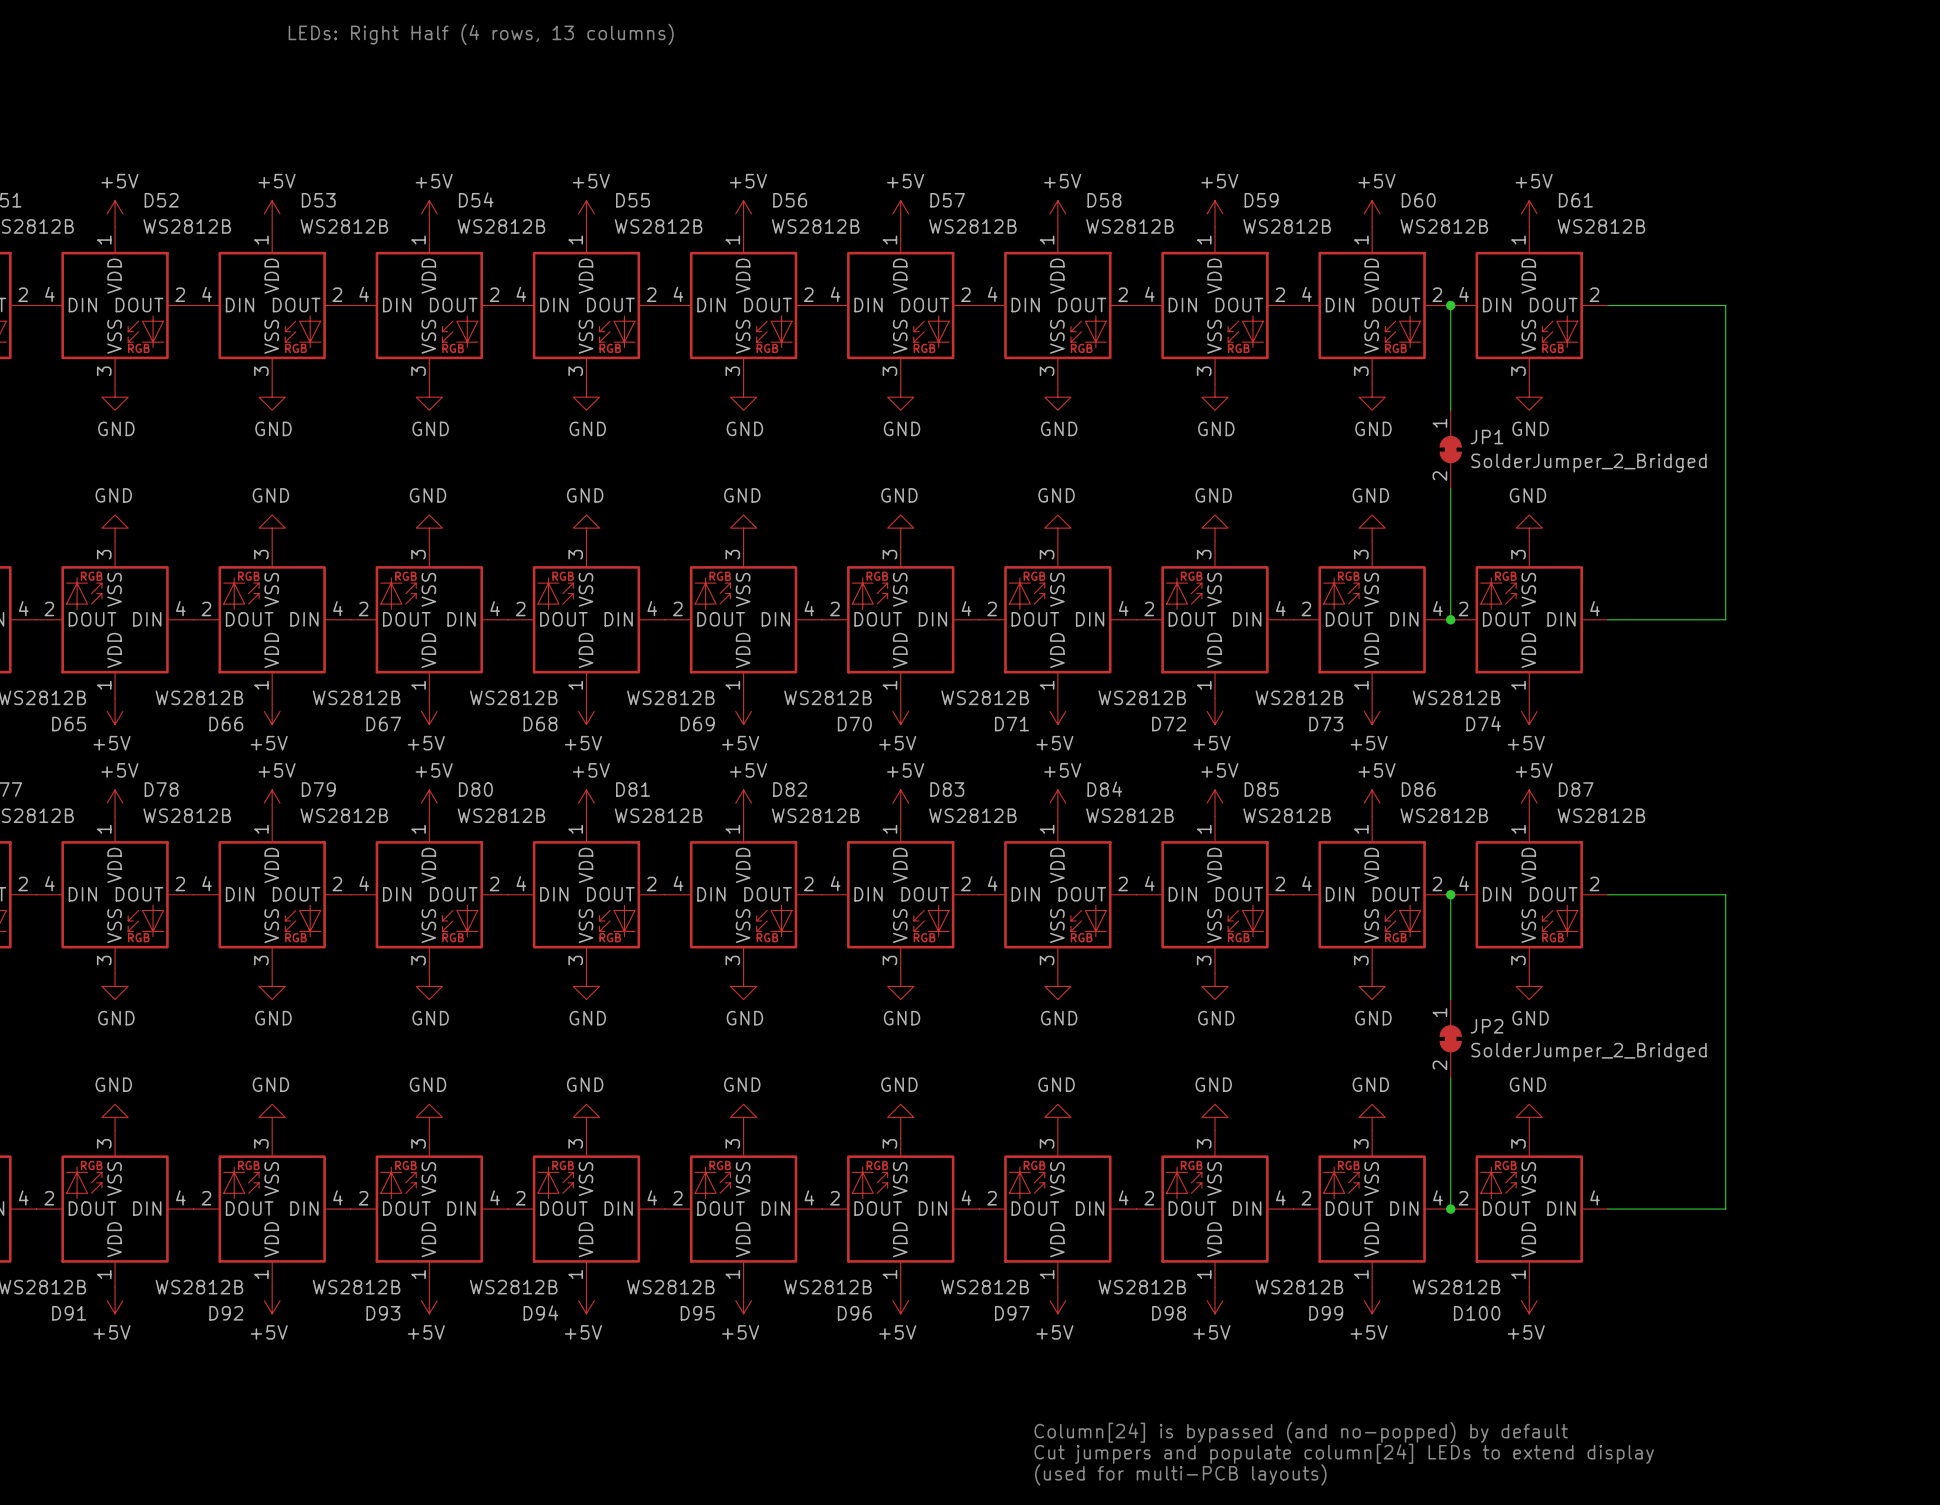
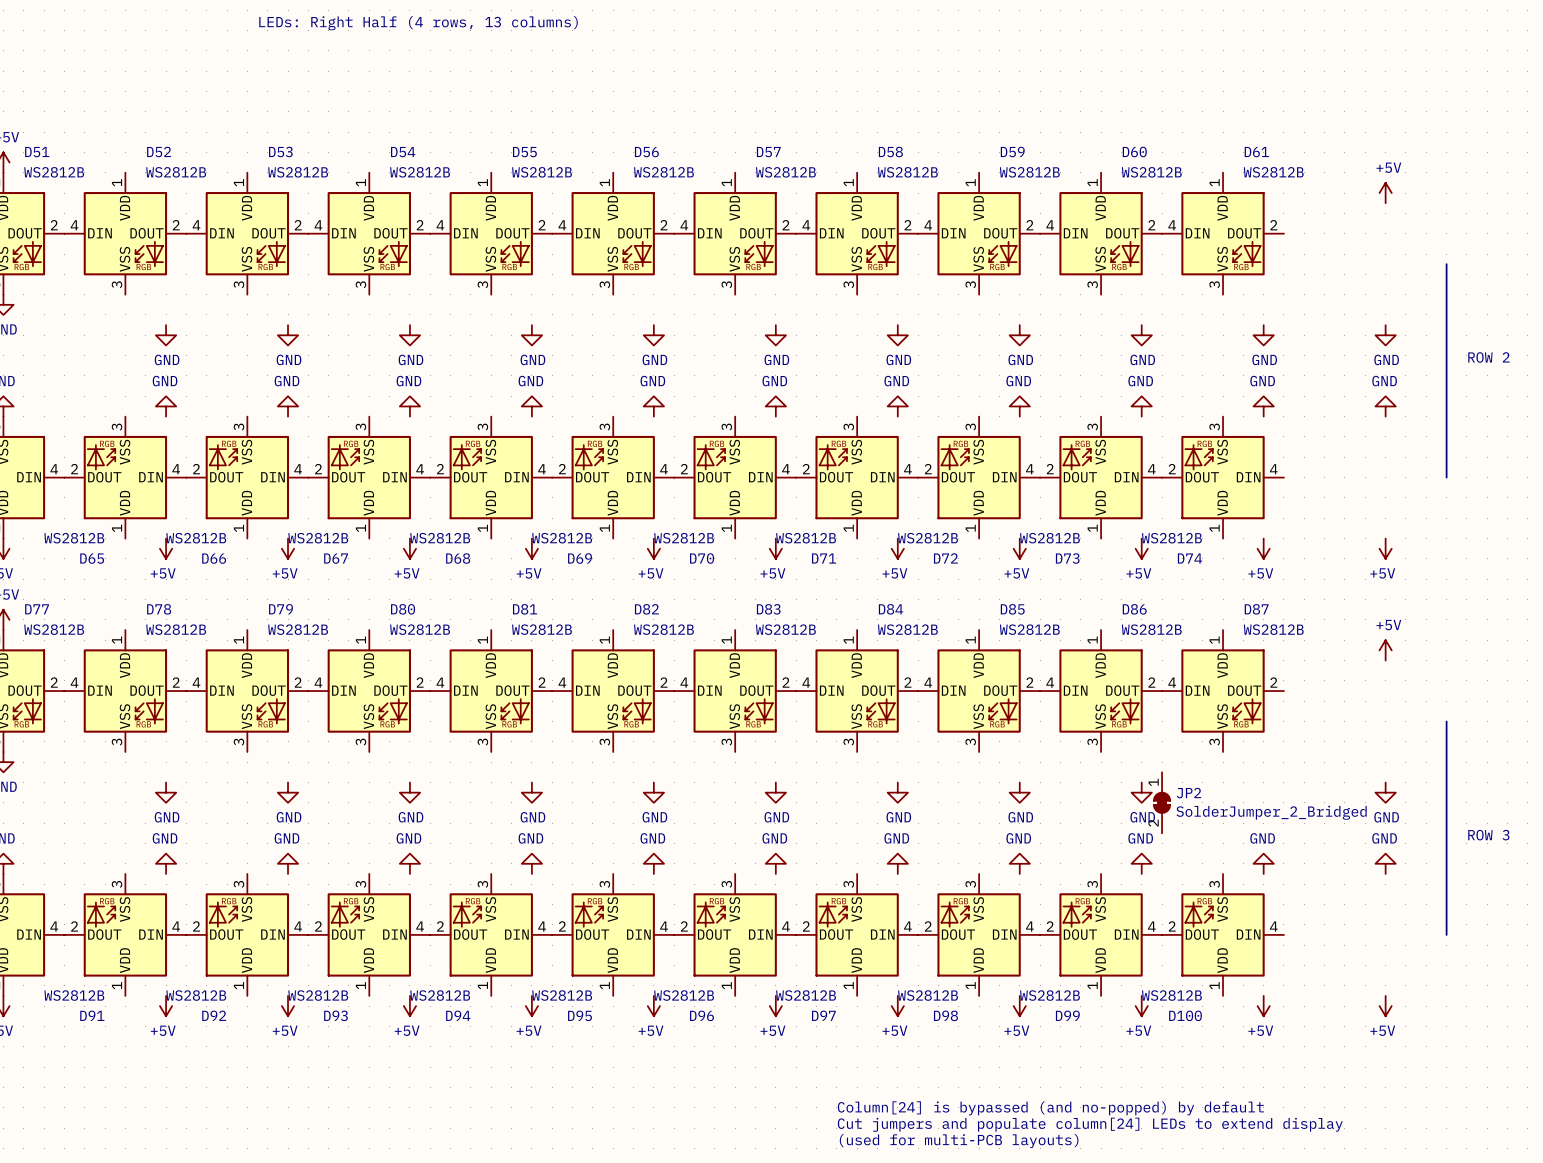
power symbol: +5V (115, 213) -> none
power symbol: +5V (272, 213) -> none
power symbol: +5V (429, 213) -> none
power symbol: +5V (586, 213) -> none
power symbol: +5V (743, 213) -> none
power symbol: +5V (900, 213) -> none
power symbol: +5V (1057, 213) -> none
power symbol: +5V (1215, 213) -> none
power symbol: +5V (1372, 213) -> none
power symbol: +5V (1529, 213) -> none
power symbol: none -> +5V (1385, 193)
wire: (1450, 305) (1450, 410) -> none
junction: (1450, 305) -> none
wire: (1607, 305) (1725, 305) (1725, 619) (1607, 619) -> none
wire: none -> (1446, 264) (1446, 477)
power symbol: GND (115, 397) -> none
power symbol: GND (272, 397) -> none
power symbol: GND (429, 397) -> none
power symbol: GND (586, 397) -> none
power symbol: GND (743, 397) -> none
power symbol: GND (900, 397) -> none
power symbol: GND (1057, 397) -> none
power symbol: GND (1215, 397) -> none
power symbol: GND (1372, 397) -> none
power symbol: GND (1529, 397) -> none
power symbol: none -> GND (166, 335)
power symbol: none -> GND (288, 335)
power symbol: none -> GND (409, 335)
power symbol: none -> GND (531, 335)
power symbol: none -> GND (653, 335)
power symbol: none -> GND (775, 335)
power symbol: none -> GND (897, 335)
power symbol: none -> GND (1019, 335)
power symbol: none -> GND (1141, 335)
power symbol: none -> GND (1263, 335)
power symbol: none -> GND (1385, 335)
JP1: SolderJumper_2_Bridged (1450, 449) -> none
text: none -> ROW 2 (1488, 357)
wire: (1450, 488) (1450, 619) -> none
power symbol: GND (115, 528) -> none
power symbol: none -> GND (166, 406)
power symbol: GND (272, 528) -> none
power symbol: none -> GND (288, 406)
power symbol: GND (429, 528) -> none
power symbol: none -> GND (409, 406)
power symbol: GND (586, 528) -> none
power symbol: none -> GND (531, 406)
power symbol: GND (743, 528) -> none
power symbol: none -> GND (653, 406)
power symbol: GND (900, 528) -> none
power symbol: none -> GND (775, 406)
power symbol: GND (1057, 528) -> none
power symbol: none -> GND (897, 406)
power symbol: GND (1215, 528) -> none
power symbol: none -> GND (1019, 406)
power symbol: GND (1372, 528) -> none
power symbol: none -> GND (1141, 406)
power symbol: GND (1529, 528) -> none
power symbol: none -> GND (1263, 406)
power symbol: none -> GND (1385, 406)
junction: (1450, 619) -> none
power symbol: +5V (115, 711) -> none
power symbol: none -> +5V (166, 548)
power symbol: +5V (272, 711) -> none
power symbol: none -> +5V (288, 548)
power symbol: +5V (429, 711) -> none
power symbol: none -> +5V (409, 548)
power symbol: +5V (586, 711) -> none
power symbol: none -> +5V (531, 548)
power symbol: +5V (743, 711) -> none
power symbol: none -> +5V (653, 548)
power symbol: +5V (900, 711) -> none
power symbol: none -> +5V (775, 548)
power symbol: +5V (1057, 711) -> none
power symbol: none -> +5V (897, 548)
power symbol: +5V (1215, 711) -> none
power symbol: none -> +5V (1019, 548)
power symbol: +5V (1372, 711) -> none
power symbol: none -> +5V (1141, 548)
power symbol: +5V (1529, 711) -> none
power symbol: none -> +5V (1263, 548)
power symbol: none -> +5V (1385, 548)
power symbol: +5V (115, 803) -> none
power symbol: +5V (272, 803) -> none
power symbol: +5V (429, 803) -> none
power symbol: +5V (586, 803) -> none
power symbol: +5V (743, 803) -> none
power symbol: +5V (900, 803) -> none
power symbol: +5V (1057, 803) -> none
power symbol: +5V (1215, 803) -> none
power symbol: +5V (1372, 803) -> none
power symbol: +5V (1529, 803) -> none
power symbol: none -> +5V (1385, 650)
wire: (1450, 894) (1450, 999) -> none
junction: (1450, 894) -> none
wire: (1607, 894) (1725, 894) (1725, 1209) (1607, 1209) -> none
wire: none -> (1446, 721) (1446, 934)
power symbol: GND (115, 986) -> none
power symbol: GND (272, 986) -> none
power symbol: GND (429, 986) -> none
power symbol: GND (586, 986) -> none
power symbol: GND (743, 986) -> none
power symbol: GND (900, 986) -> none
power symbol: GND (1057, 986) -> none
power symbol: GND (1215, 986) -> none
power symbol: GND (1372, 986) -> none
power symbol: GND (1529, 986) -> none
power symbol: none -> GND (166, 792)
power symbol: none -> GND (288, 792)
power symbol: none -> GND (409, 792)
power symbol: none -> GND (531, 792)
power symbol: none -> GND (653, 792)
power symbol: none -> GND (775, 792)
power symbol: none -> GND (897, 792)
power symbol: none -> GND (1019, 792)
power symbol: none -> GND (1141, 792)
power symbol: none -> GND (1385, 792)
wire: (1450, 1078) (1450, 1209) -> none
text: none -> ROW 3 (1488, 835)
power symbol: GND (115, 1117) -> none
power symbol: none -> GND (166, 863)
power symbol: GND (272, 1117) -> none
power symbol: none -> GND (288, 863)
power symbol: GND (429, 1117) -> none
power symbol: none -> GND (409, 863)
power symbol: GND (586, 1117) -> none
power symbol: none -> GND (531, 863)
power symbol: GND (743, 1117) -> none
power symbol: none -> GND (653, 863)
power symbol: GND (900, 1117) -> none
power symbol: none -> GND (775, 863)
power symbol: GND (1057, 1117) -> none
power symbol: none -> GND (897, 863)
power symbol: GND (1215, 1117) -> none
power symbol: none -> GND (1019, 863)
power symbol: GND (1372, 1117) -> none
power symbol: none -> GND (1141, 863)
power symbol: GND (1529, 1117) -> none
power symbol: none -> GND (1263, 863)
power symbol: none -> GND (1385, 863)
junction: (1450, 1209) -> none
power symbol: +5V (115, 1300) -> none
power symbol: none -> +5V (166, 1006)
power symbol: +5V (272, 1300) -> none
power symbol: none -> +5V (288, 1006)
power symbol: +5V (429, 1300) -> none
power symbol: none -> +5V (409, 1006)
power symbol: +5V (586, 1300) -> none
power symbol: none -> +5V (531, 1006)
power symbol: +5V (743, 1300) -> none
power symbol: none -> +5V (653, 1006)
power symbol: +5V (900, 1300) -> none
power symbol: none -> +5V (775, 1006)
power symbol: +5V (1057, 1300) -> none
power symbol: none -> +5V (897, 1006)
power symbol: +5V (1215, 1300) -> none
power symbol: none -> +5V (1019, 1006)
power symbol: +5V (1372, 1300) -> none
power symbol: none -> +5V (1141, 1006)
power symbol: +5V (1529, 1300) -> none
power symbol: none -> +5V (1263, 1006)
power symbol: none -> +5V (1385, 1006)

